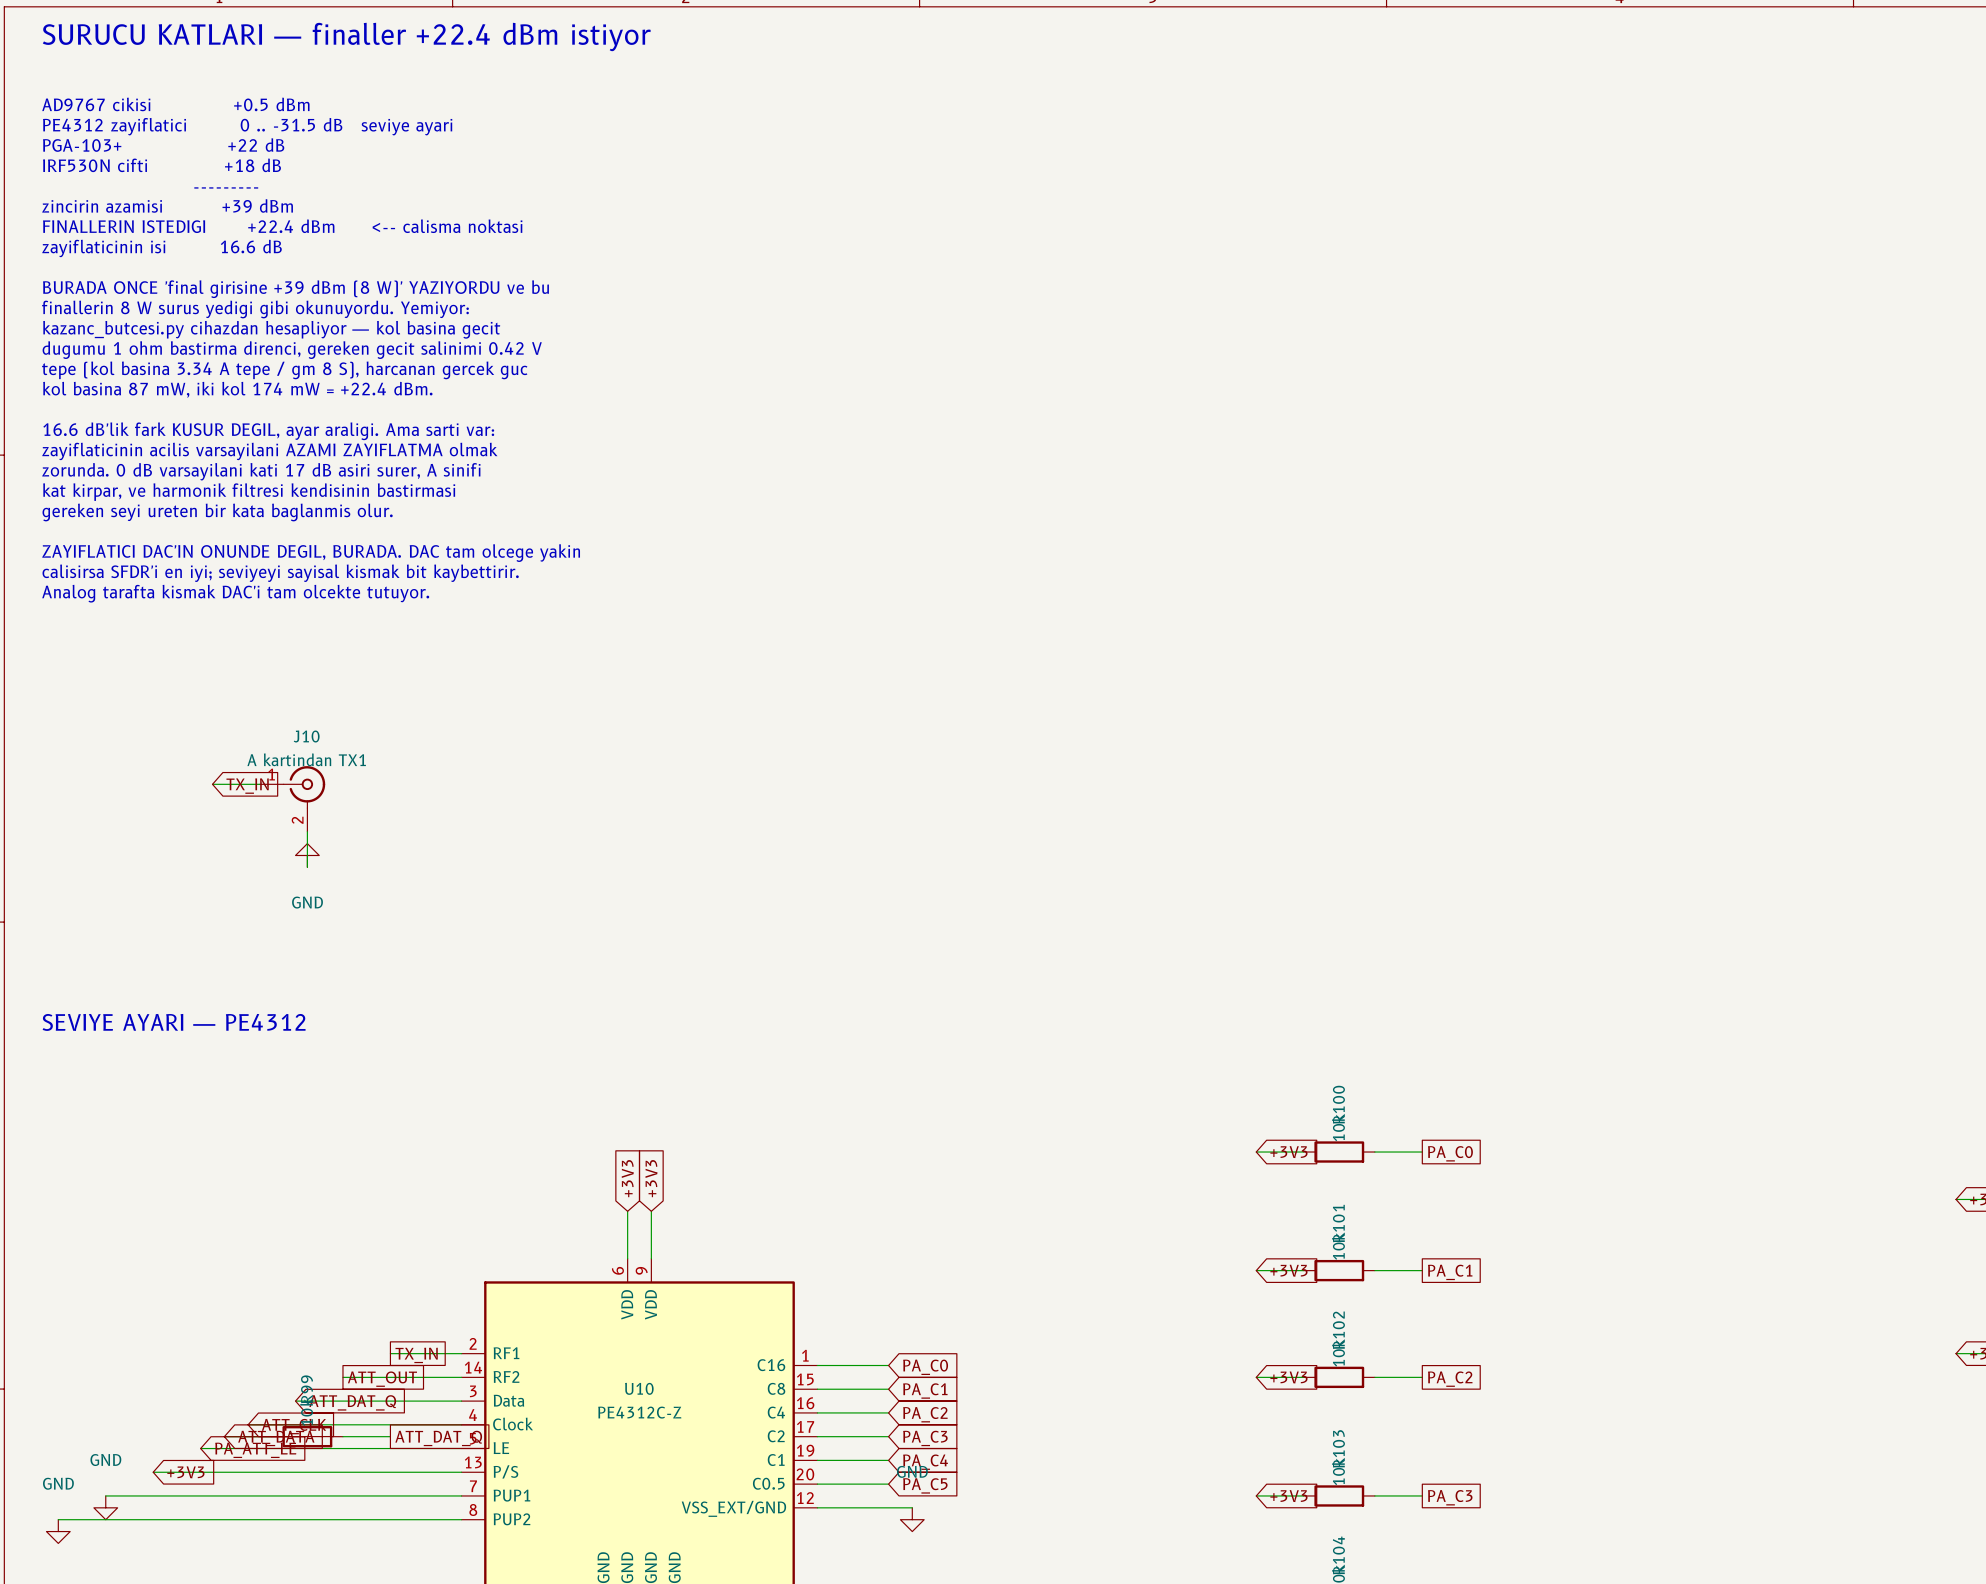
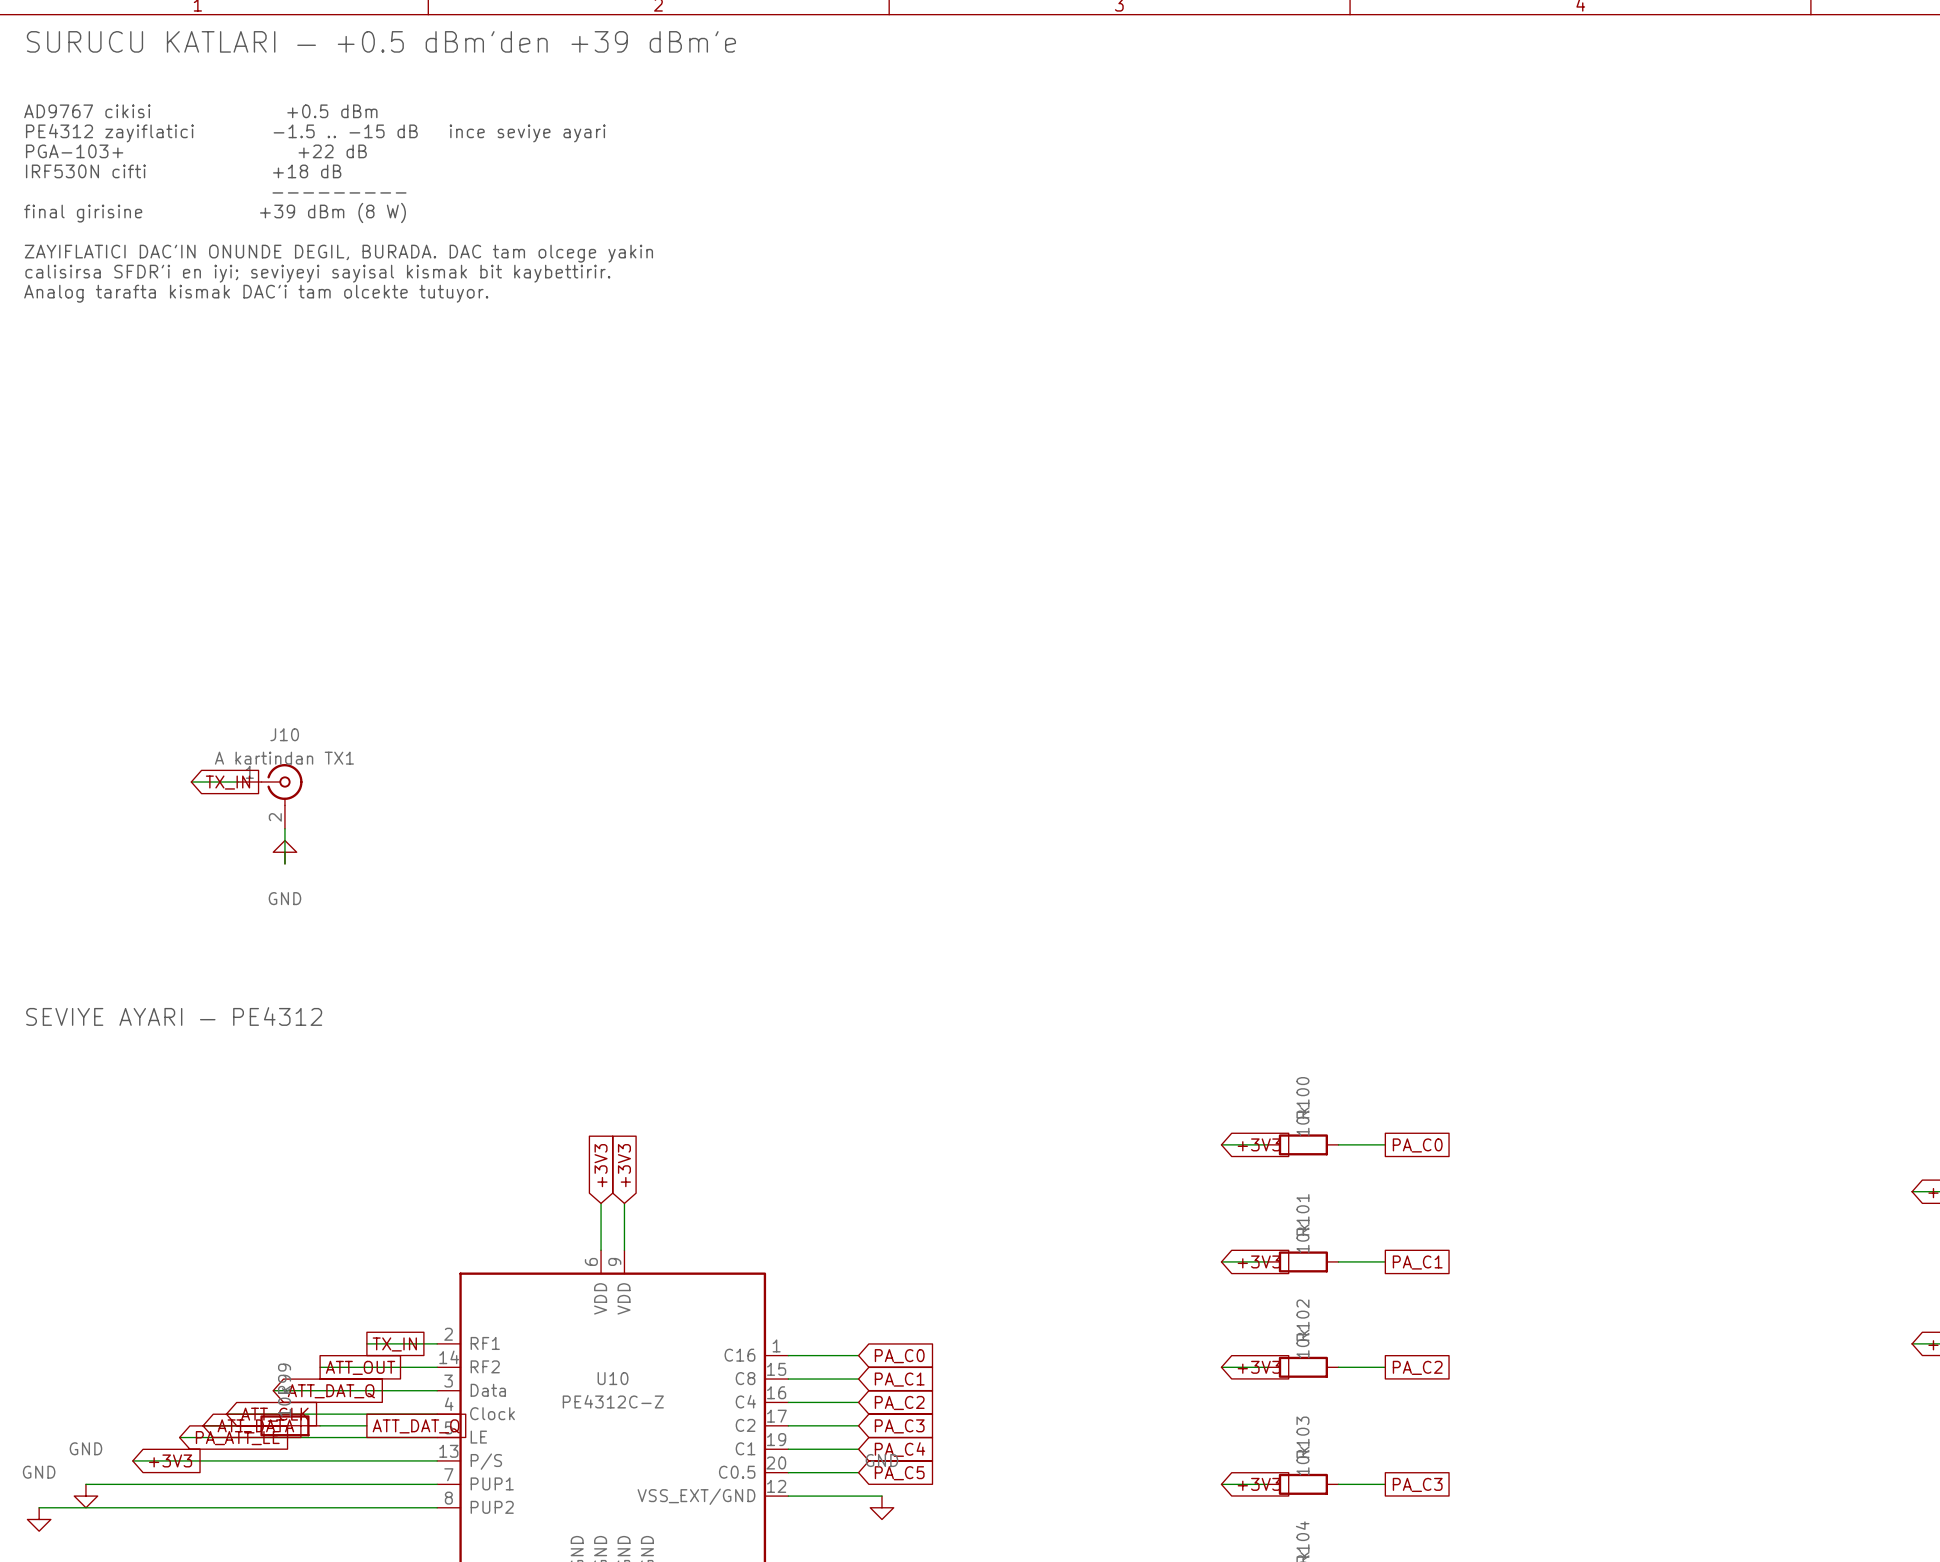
text: SURUCU KATLARI — finaller +22.4 dBm istiyor (346, 36) -> SURUCU KATLARI — +0.5 dBm'den +39 dBm'e (381, 41)
text: PE4312 zayiflatici 0 .. -31.5 dB seviye ayari (247, 126) -> PE4312 zayiflatici -1.5 .. -15 dB ince seviye ayari (315, 133)
text: zincirin azamisi +39 dBm (167, 205) -> final girisine +39 dBm (8 W) (215, 212)
text: FINALLERIN ISTEDIGI +22.4 dBm <-- calisma noktasi (282, 226) -> none
text: zayiflaticinin isi 16.6 dB (161, 248) -> ZAYIFLATICI DAC'IN ONUNDE DEGIL, BURADA. DAC tam olcege yakin (338, 253)
text: none -> calisirsa SFDR'i en iyi; seviyeyi sayisal kismak bit kaybettirir. (317, 273)
text: BURADA ONCE 'final girisine +39 dBm (8 W)' YAZIYORDU ve bu (295, 289) -> Analog tarafta kismak DAC'i tam olcekte tutuyor. (256, 293)
text: finallerin 8 W surus yedigi gibi okunuyordu. Yemiyor: (255, 309) -> none
text: kazanc_butcesi.py cihazdan hesapliyor — kol basina gecit (271, 329) -> none
text: dugumu 1 ohm bastirma direnci, gereken gecit salinimi 0.42 V (292, 350) -> none
text: tepe (kol basina 3.34 A tepe / gm 8 S), harcanan gercek guc (284, 370) -> none
text: kol basina 87 mW, iki kol 174 mW = +22.4 dBm. (237, 389) -> none
text: 16.6 dB'lik fark KUSUR DEGIL, ayar araligi. Ama sarti var: (268, 431) -> none
text: zayiflaticinin acilis varsayilani AZAMI ZAYIFLATMA olmak (269, 451) -> none
text: zorunda. 0 dB varsayilani kati 17 dB asiri surer, A sinifi (261, 471) -> none
text: kat kirpar, ve harmonik filtresi kendisinin bastirmasi (249, 492) -> none
text: gereken seyi ureten bir kata baglanmis olur. (217, 512) -> none
text: ZAYIFLATICI DAC'IN ONUNDE DEGIL, BURADA. DAC tam olcege yakin (311, 553) -> none
text: calisirsa SFDR'i en iyi; seviyeyi sayisal kismak bit kaybettirir. (280, 573) -> none
text: Analog tarafta kismak DAC'i tam olcekte tutuyor. (235, 593) -> none

